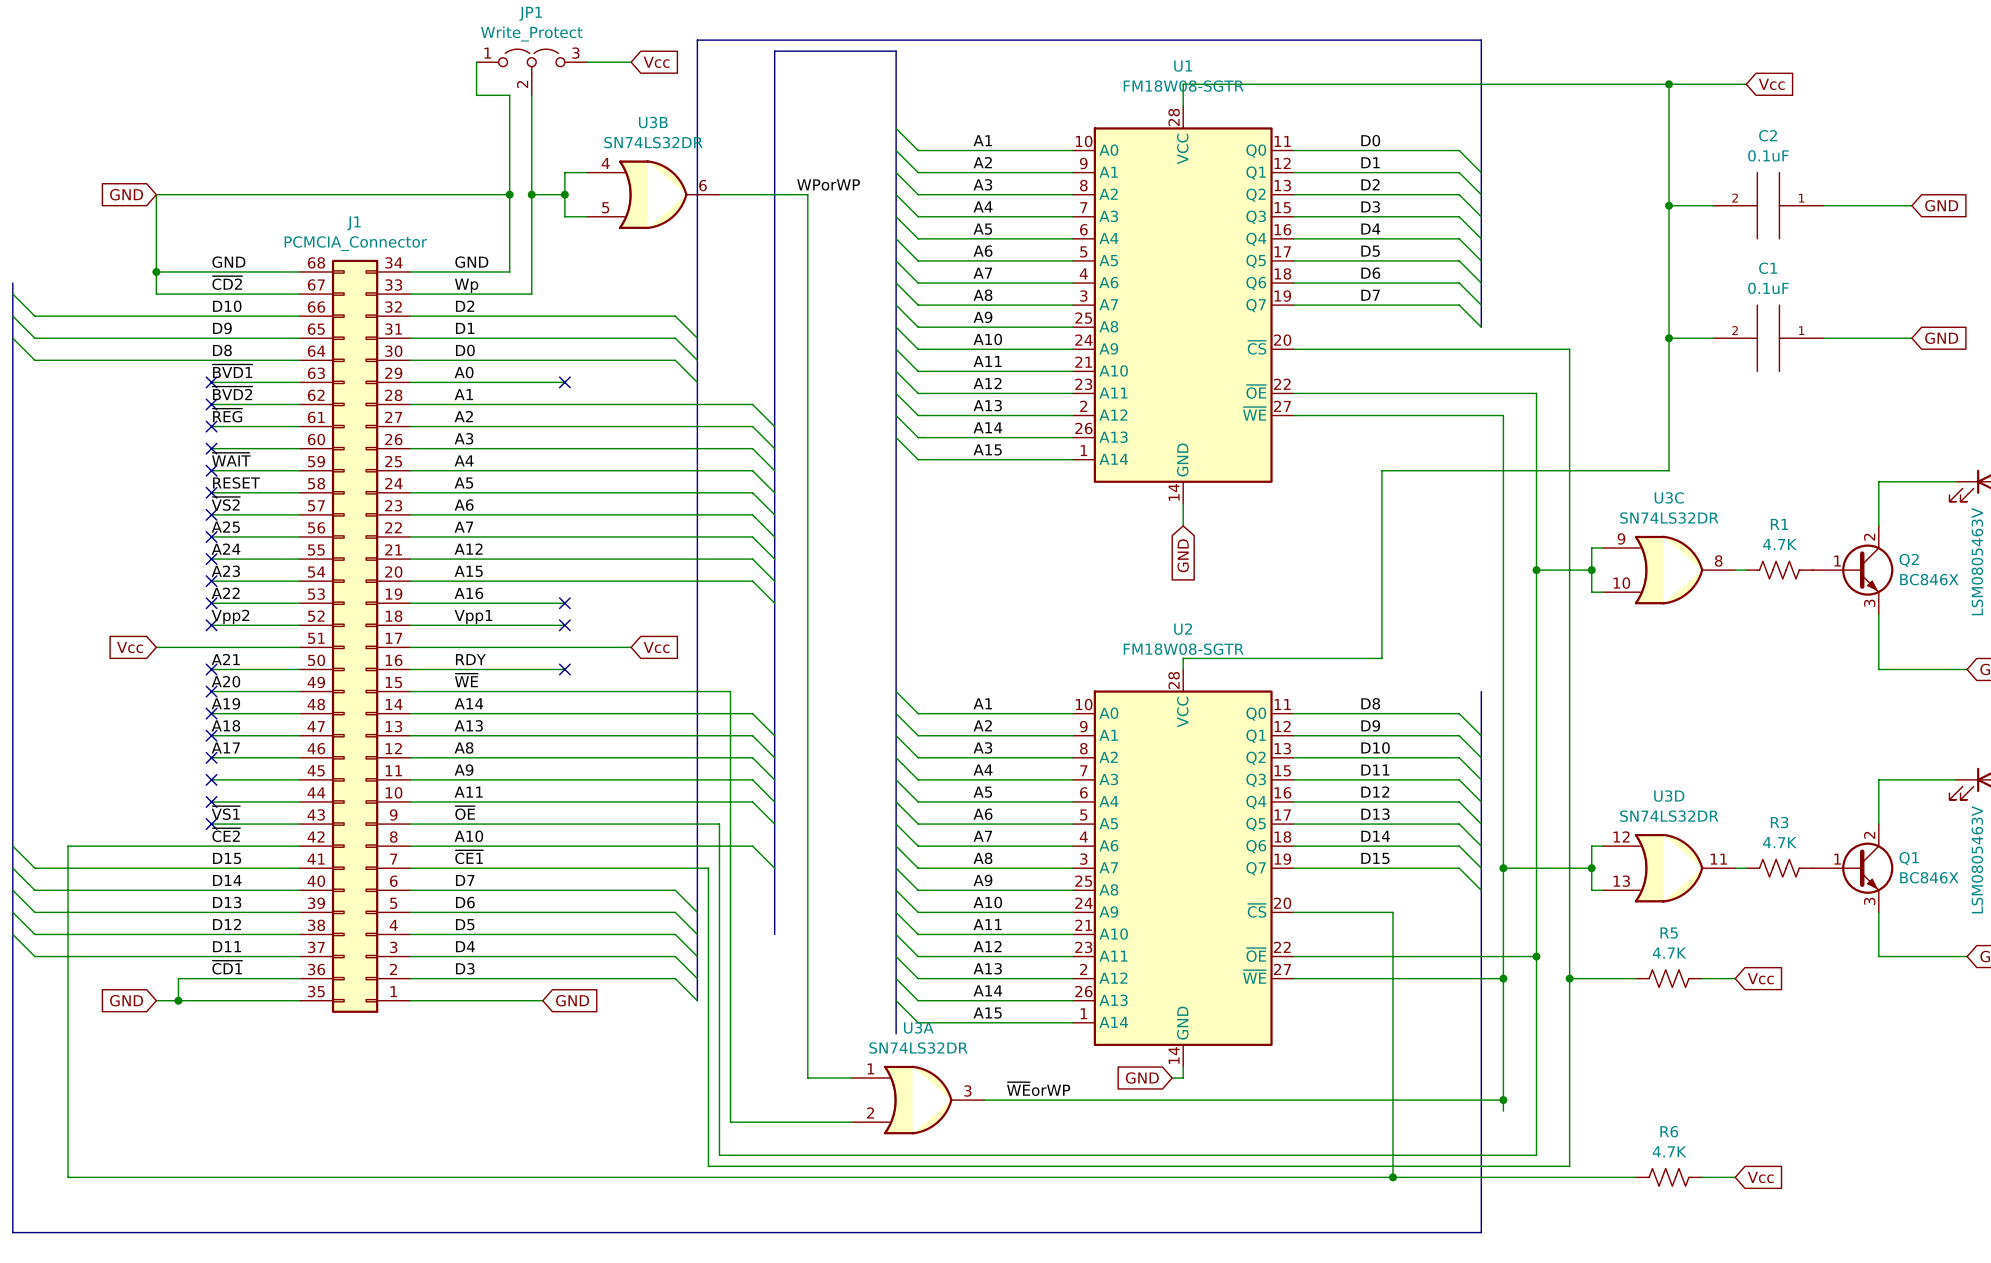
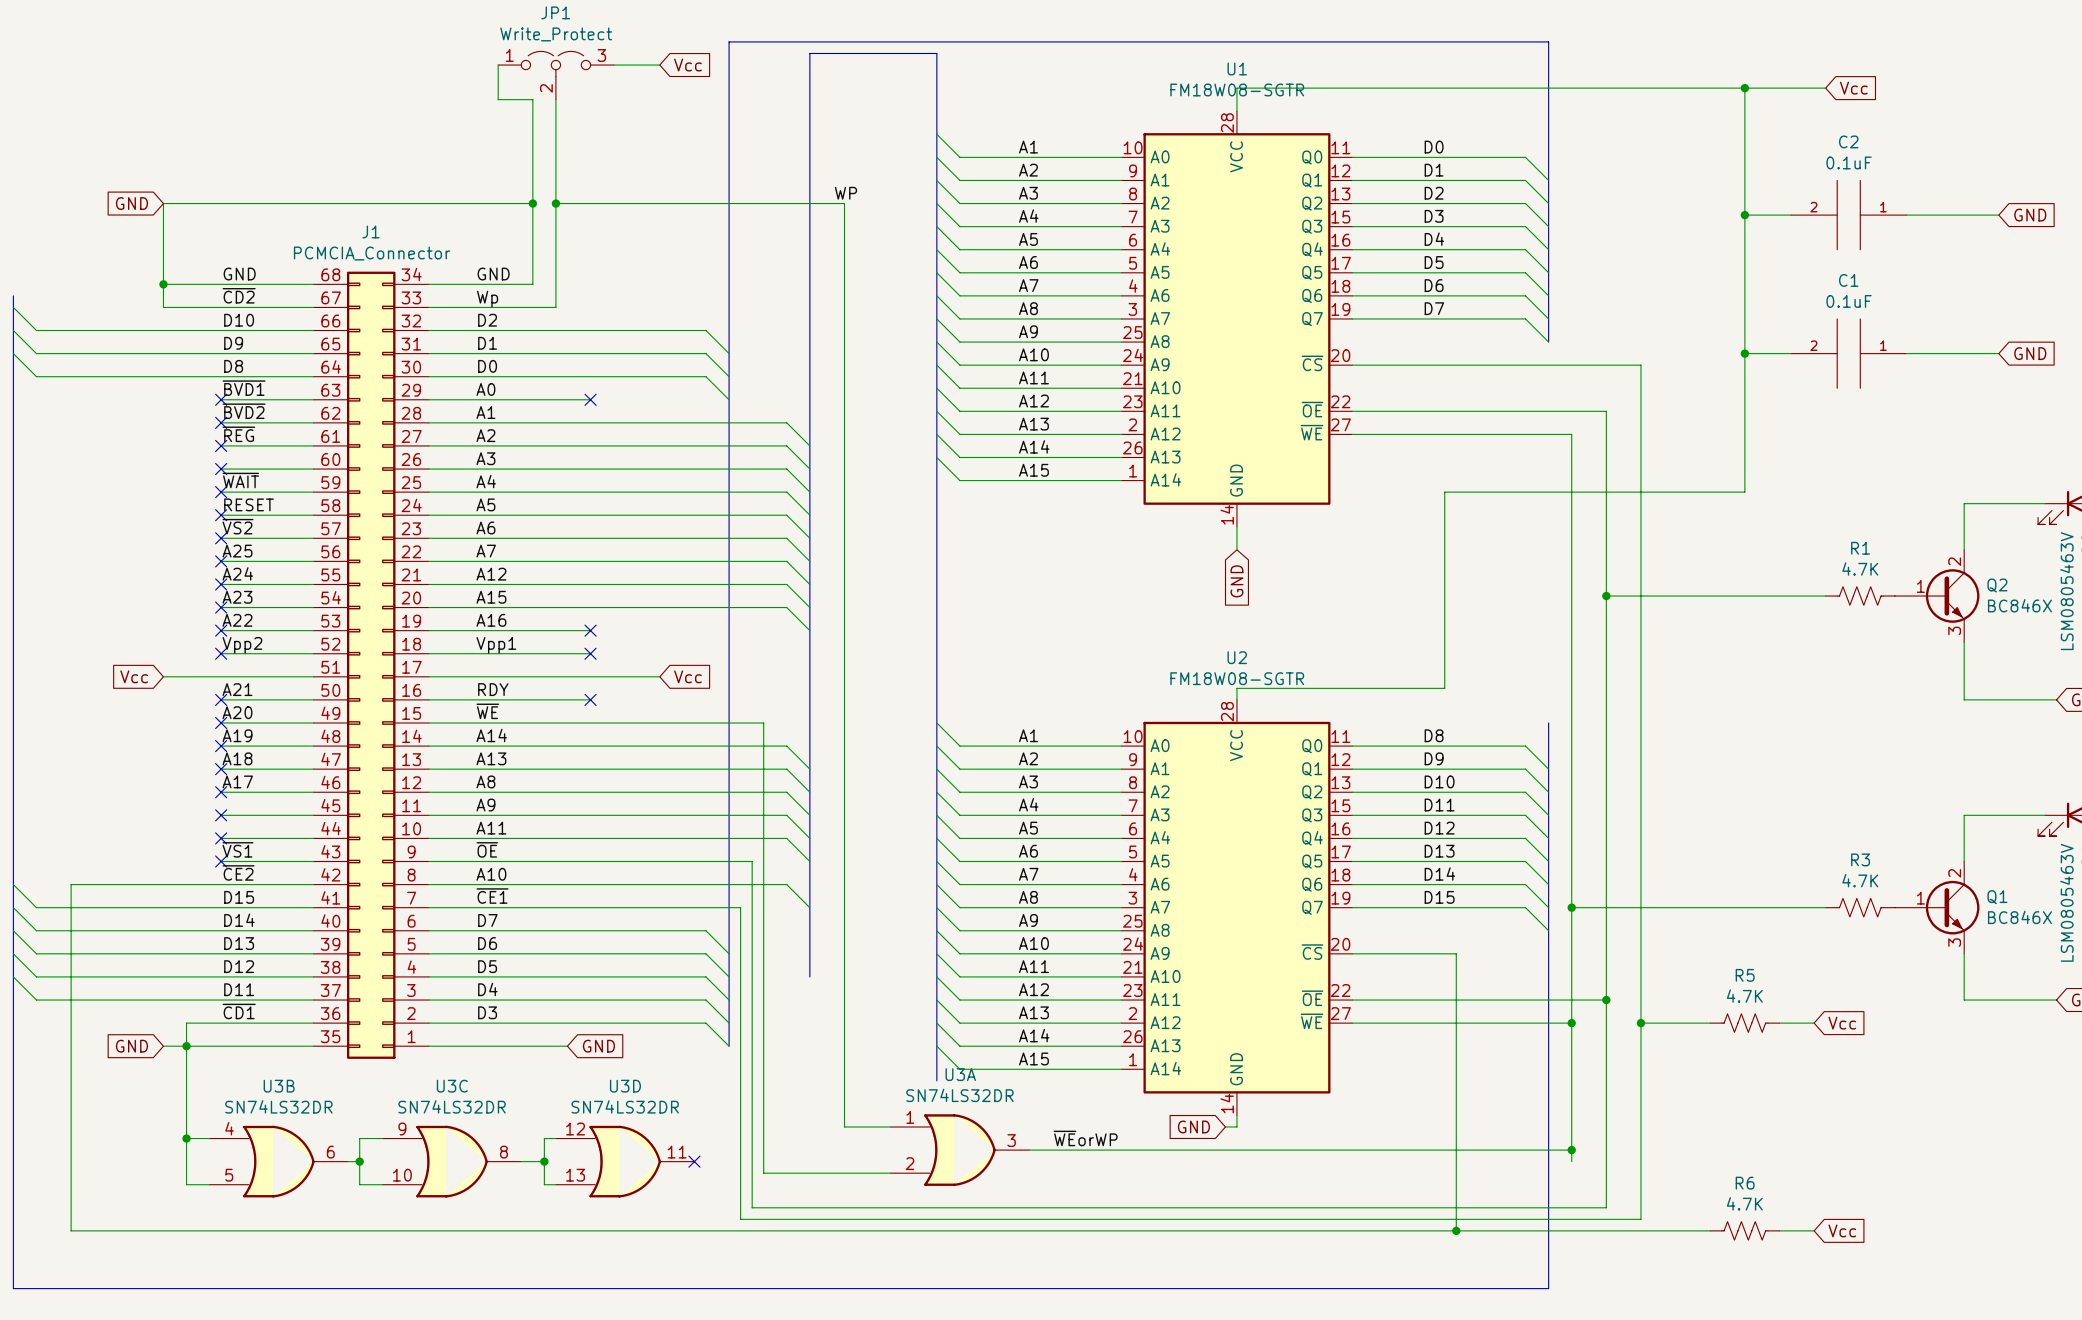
wire: (586, 172) (564, 172) (564, 216) (586, 216) -> none
label: WPorWP (828, 184) -> WP (845, 193)
wire: none -> (590, 203) (752, 203)
junction: (564, 194) -> none
U3B position: (653, 194) -> (278, 1161)
wire: (1602, 548) (1591, 548) (1591, 592) (1602, 592) -> none
wire: none -> (1664, 596) (1814, 596)
junction: (1591, 570) -> none
U3C position: (1669, 570) -> (452, 1161)
wire: (1602, 846) (1591, 846) (1591, 890) (1602, 890) -> none
wire: none -> (1664, 907) (1814, 907)
junction: (1591, 868) -> none
U3D position: (1669, 868) -> (625, 1161)
wire: none -> (186, 1046) (186, 1184) (209, 1184)
wire: none -> (186, 1138) (209, 1138)
junction: none -> (186, 1138)
wire: none -> (382, 1138) (359, 1138) (359, 1184) (382, 1184)
wire: none -> (555, 1138) (544, 1138) (544, 1184) (555, 1184)
wire: none -> (348, 1161) (359, 1161)
junction: none -> (359, 1161)
wire: none -> (521, 1161) (544, 1161)
junction: none -> (544, 1161)
no-connect mark: none -> (694, 1161)

